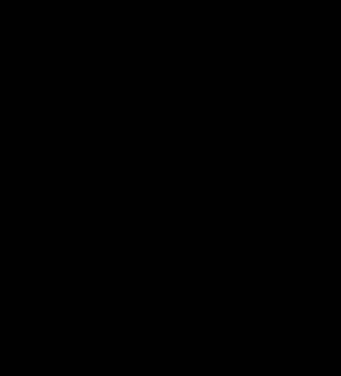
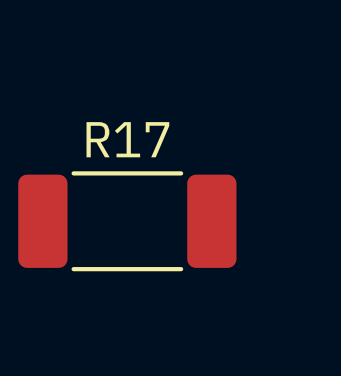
R17: none -> (127, 221)

